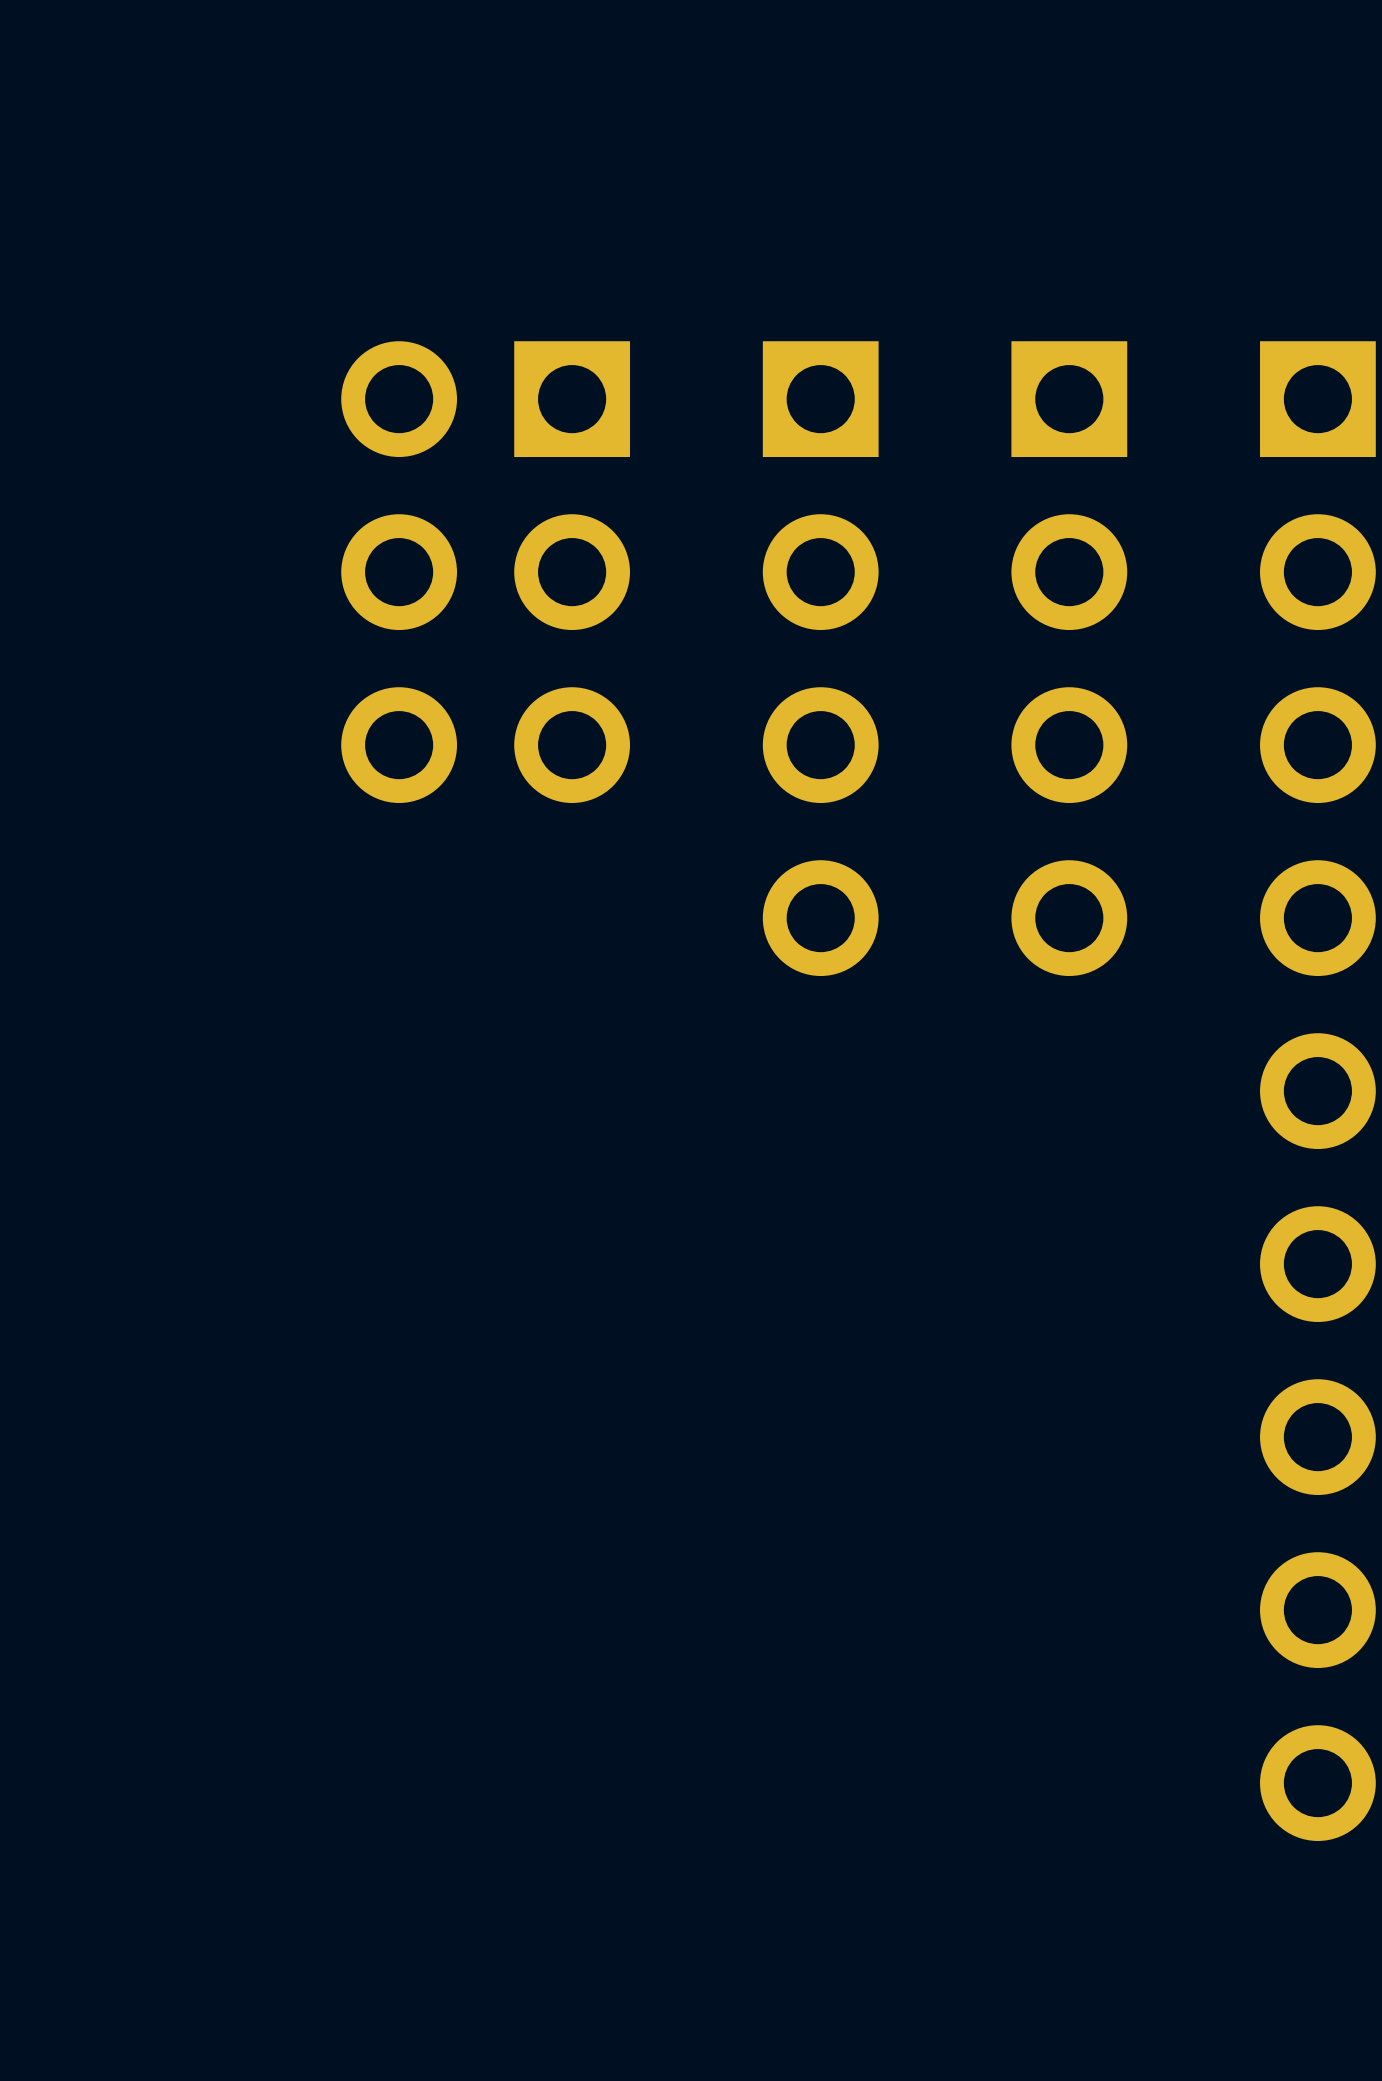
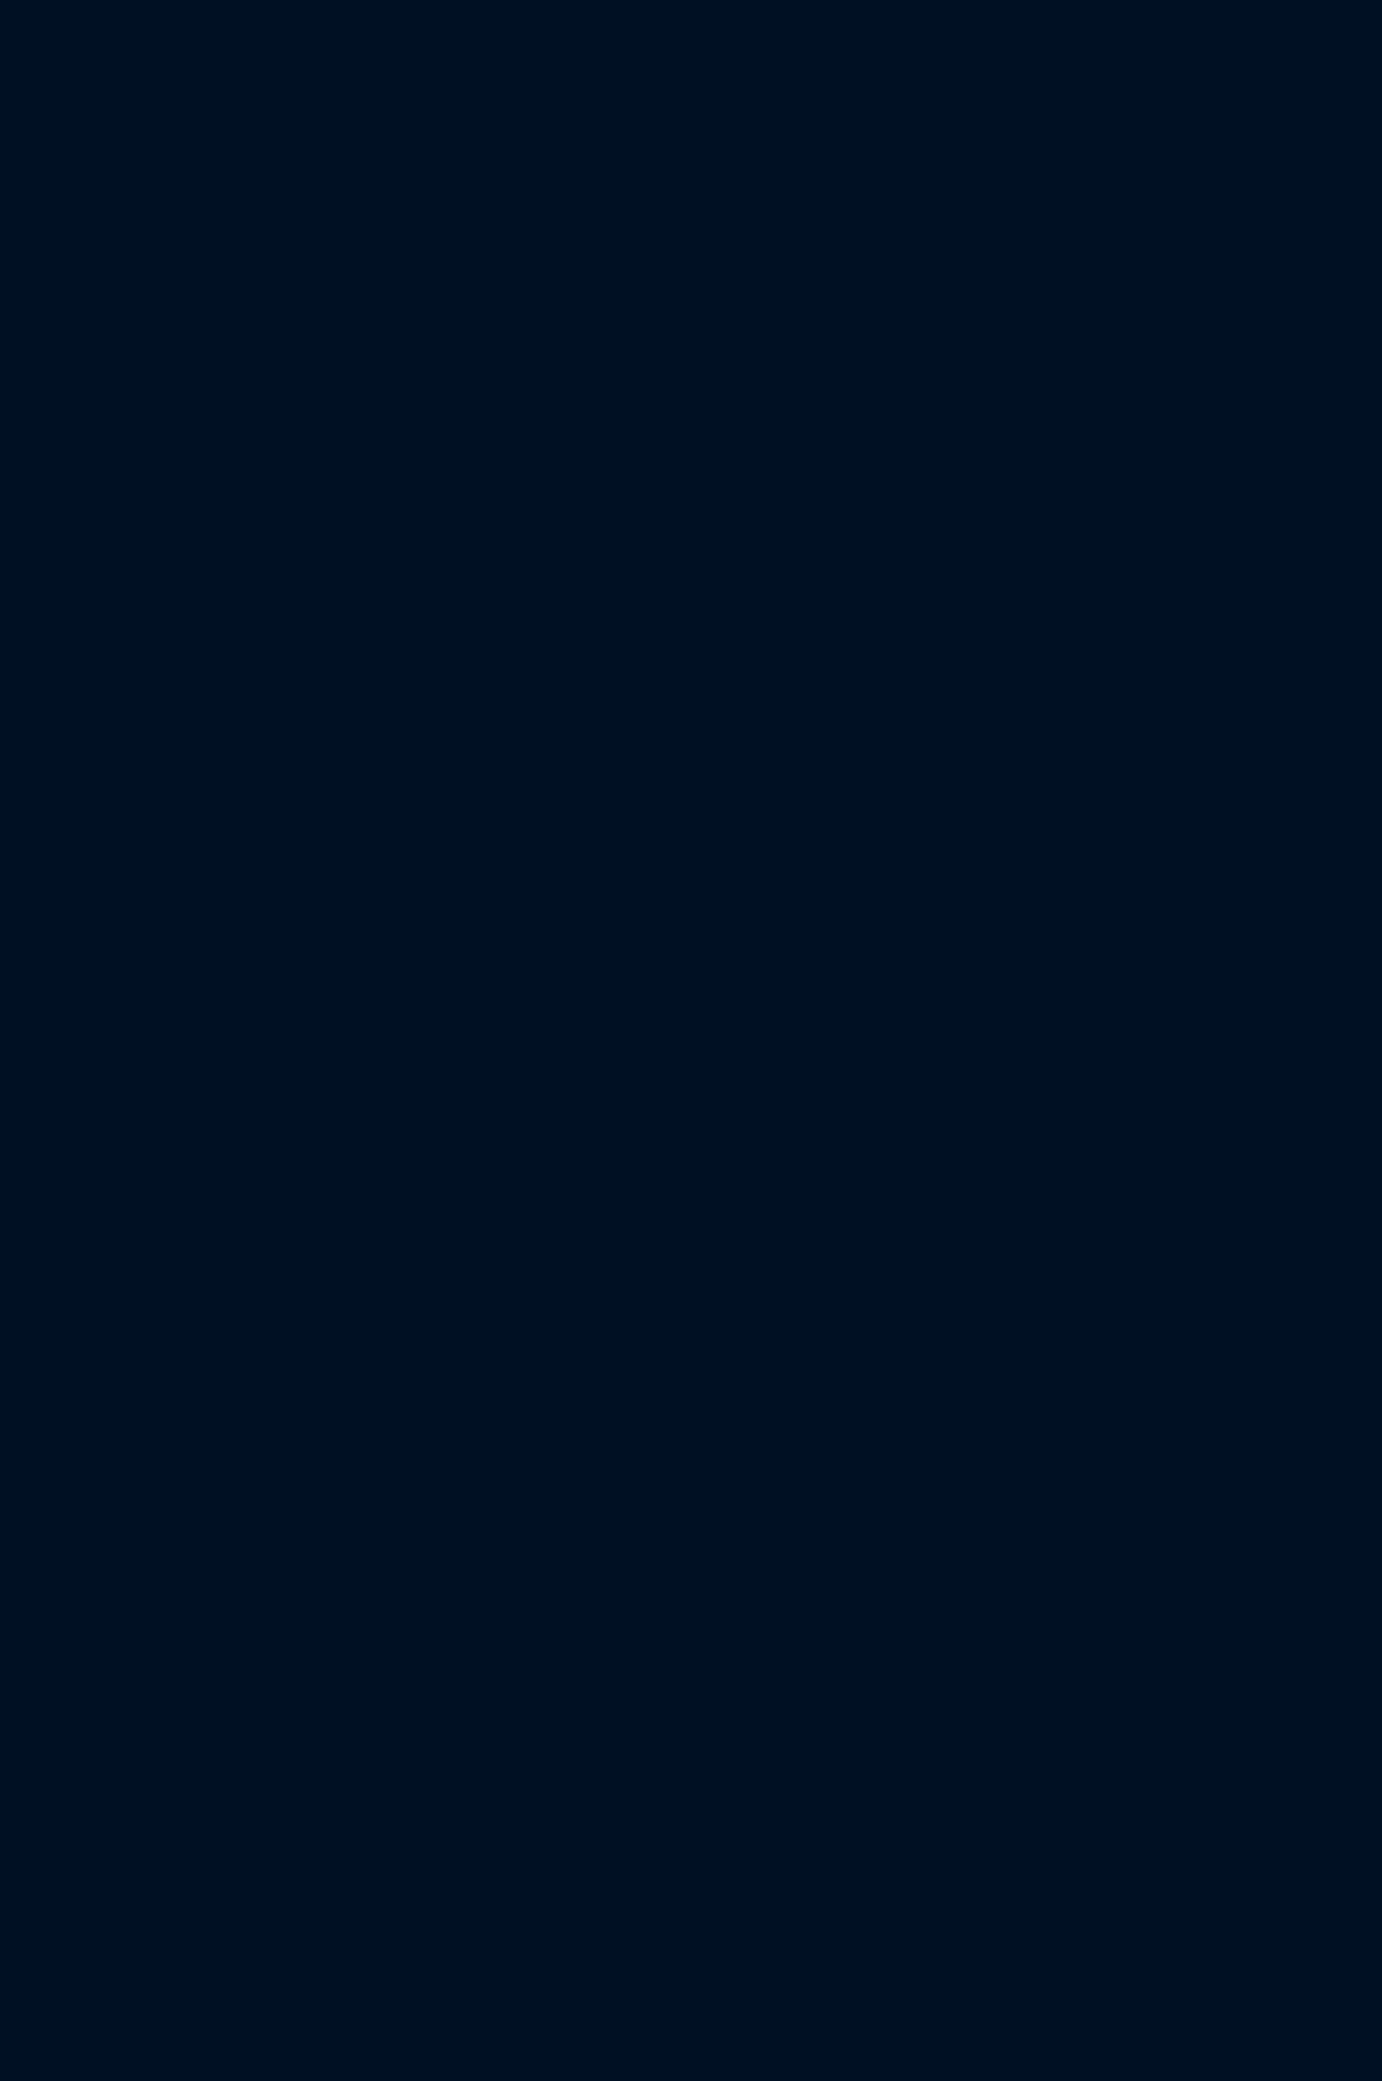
part: (485, 572) -> none
part: (820, 658) -> none
part: (1069, 658) -> none
part: (1317, 1091) -> none

